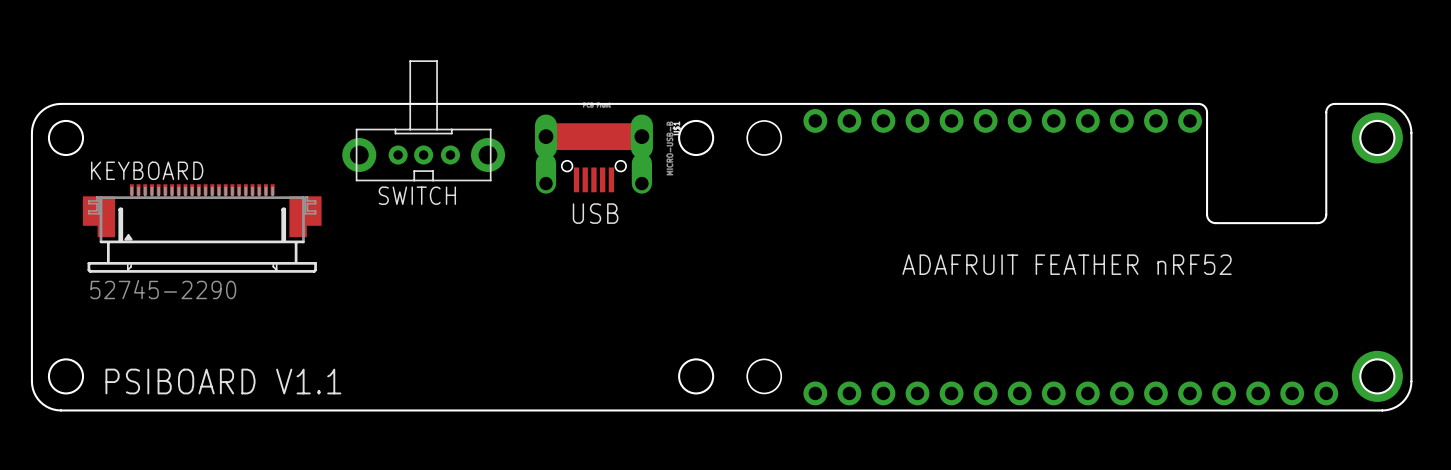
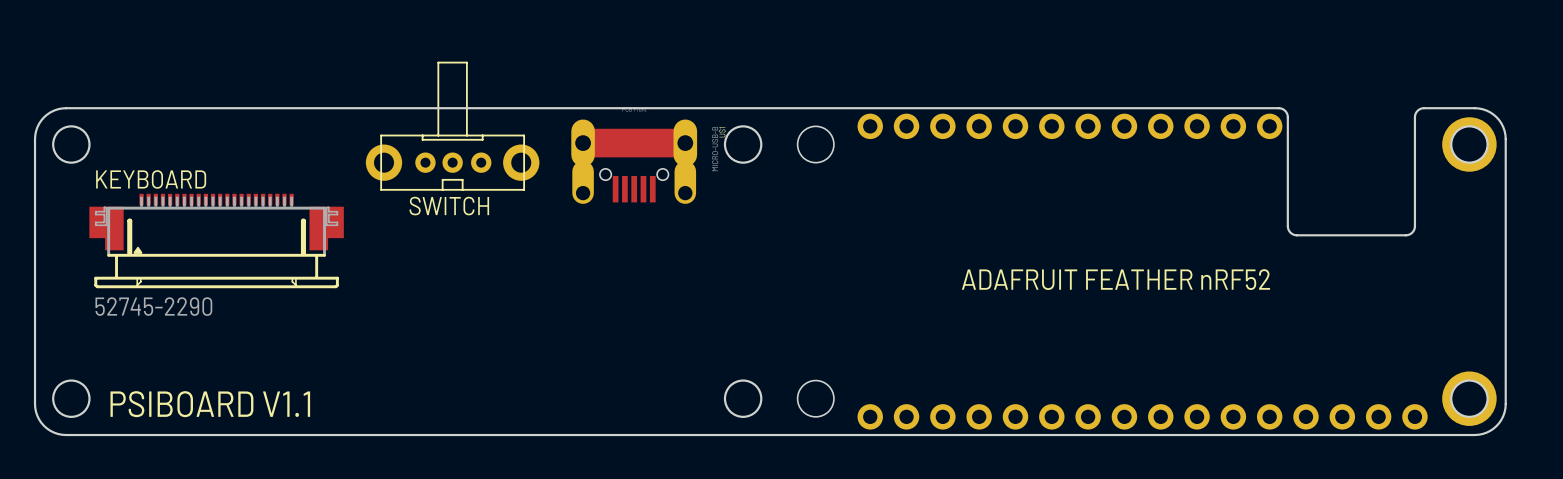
text: USB (595, 213) -> none

